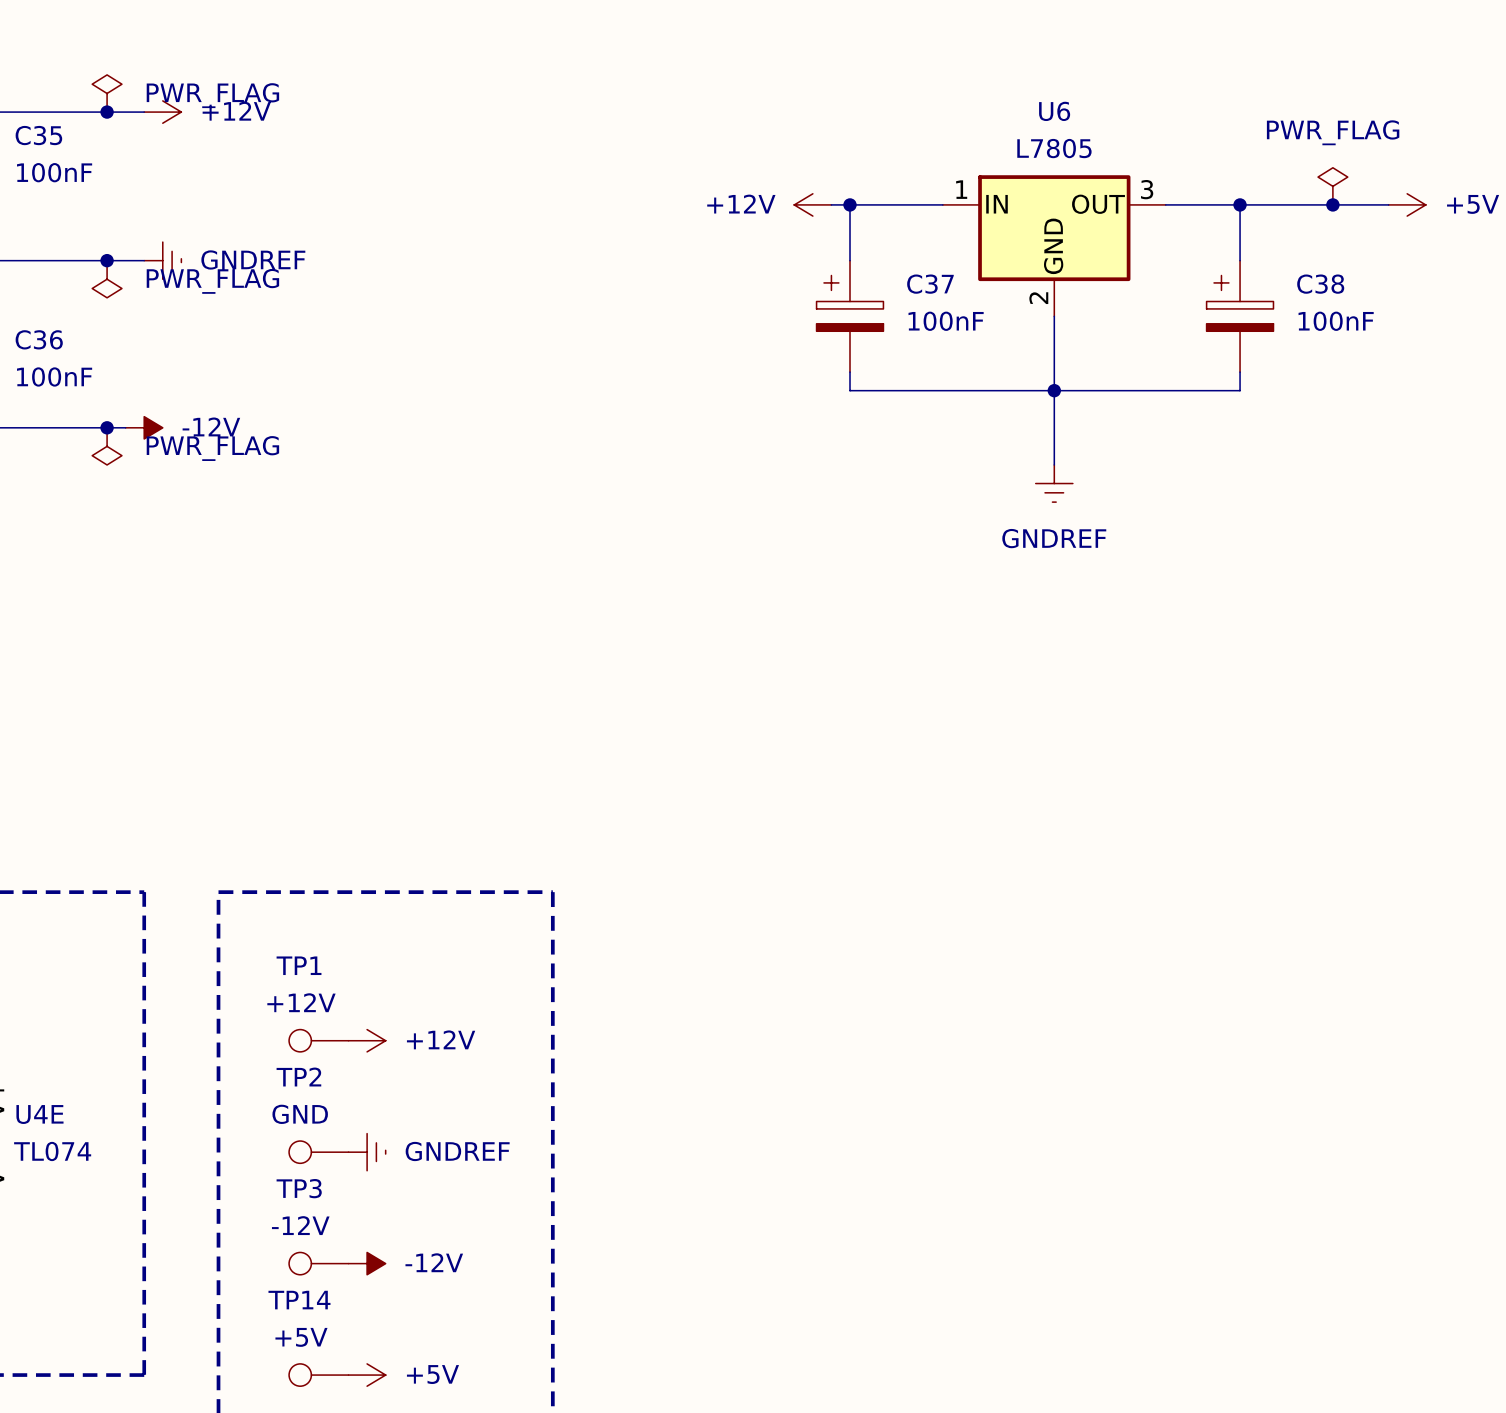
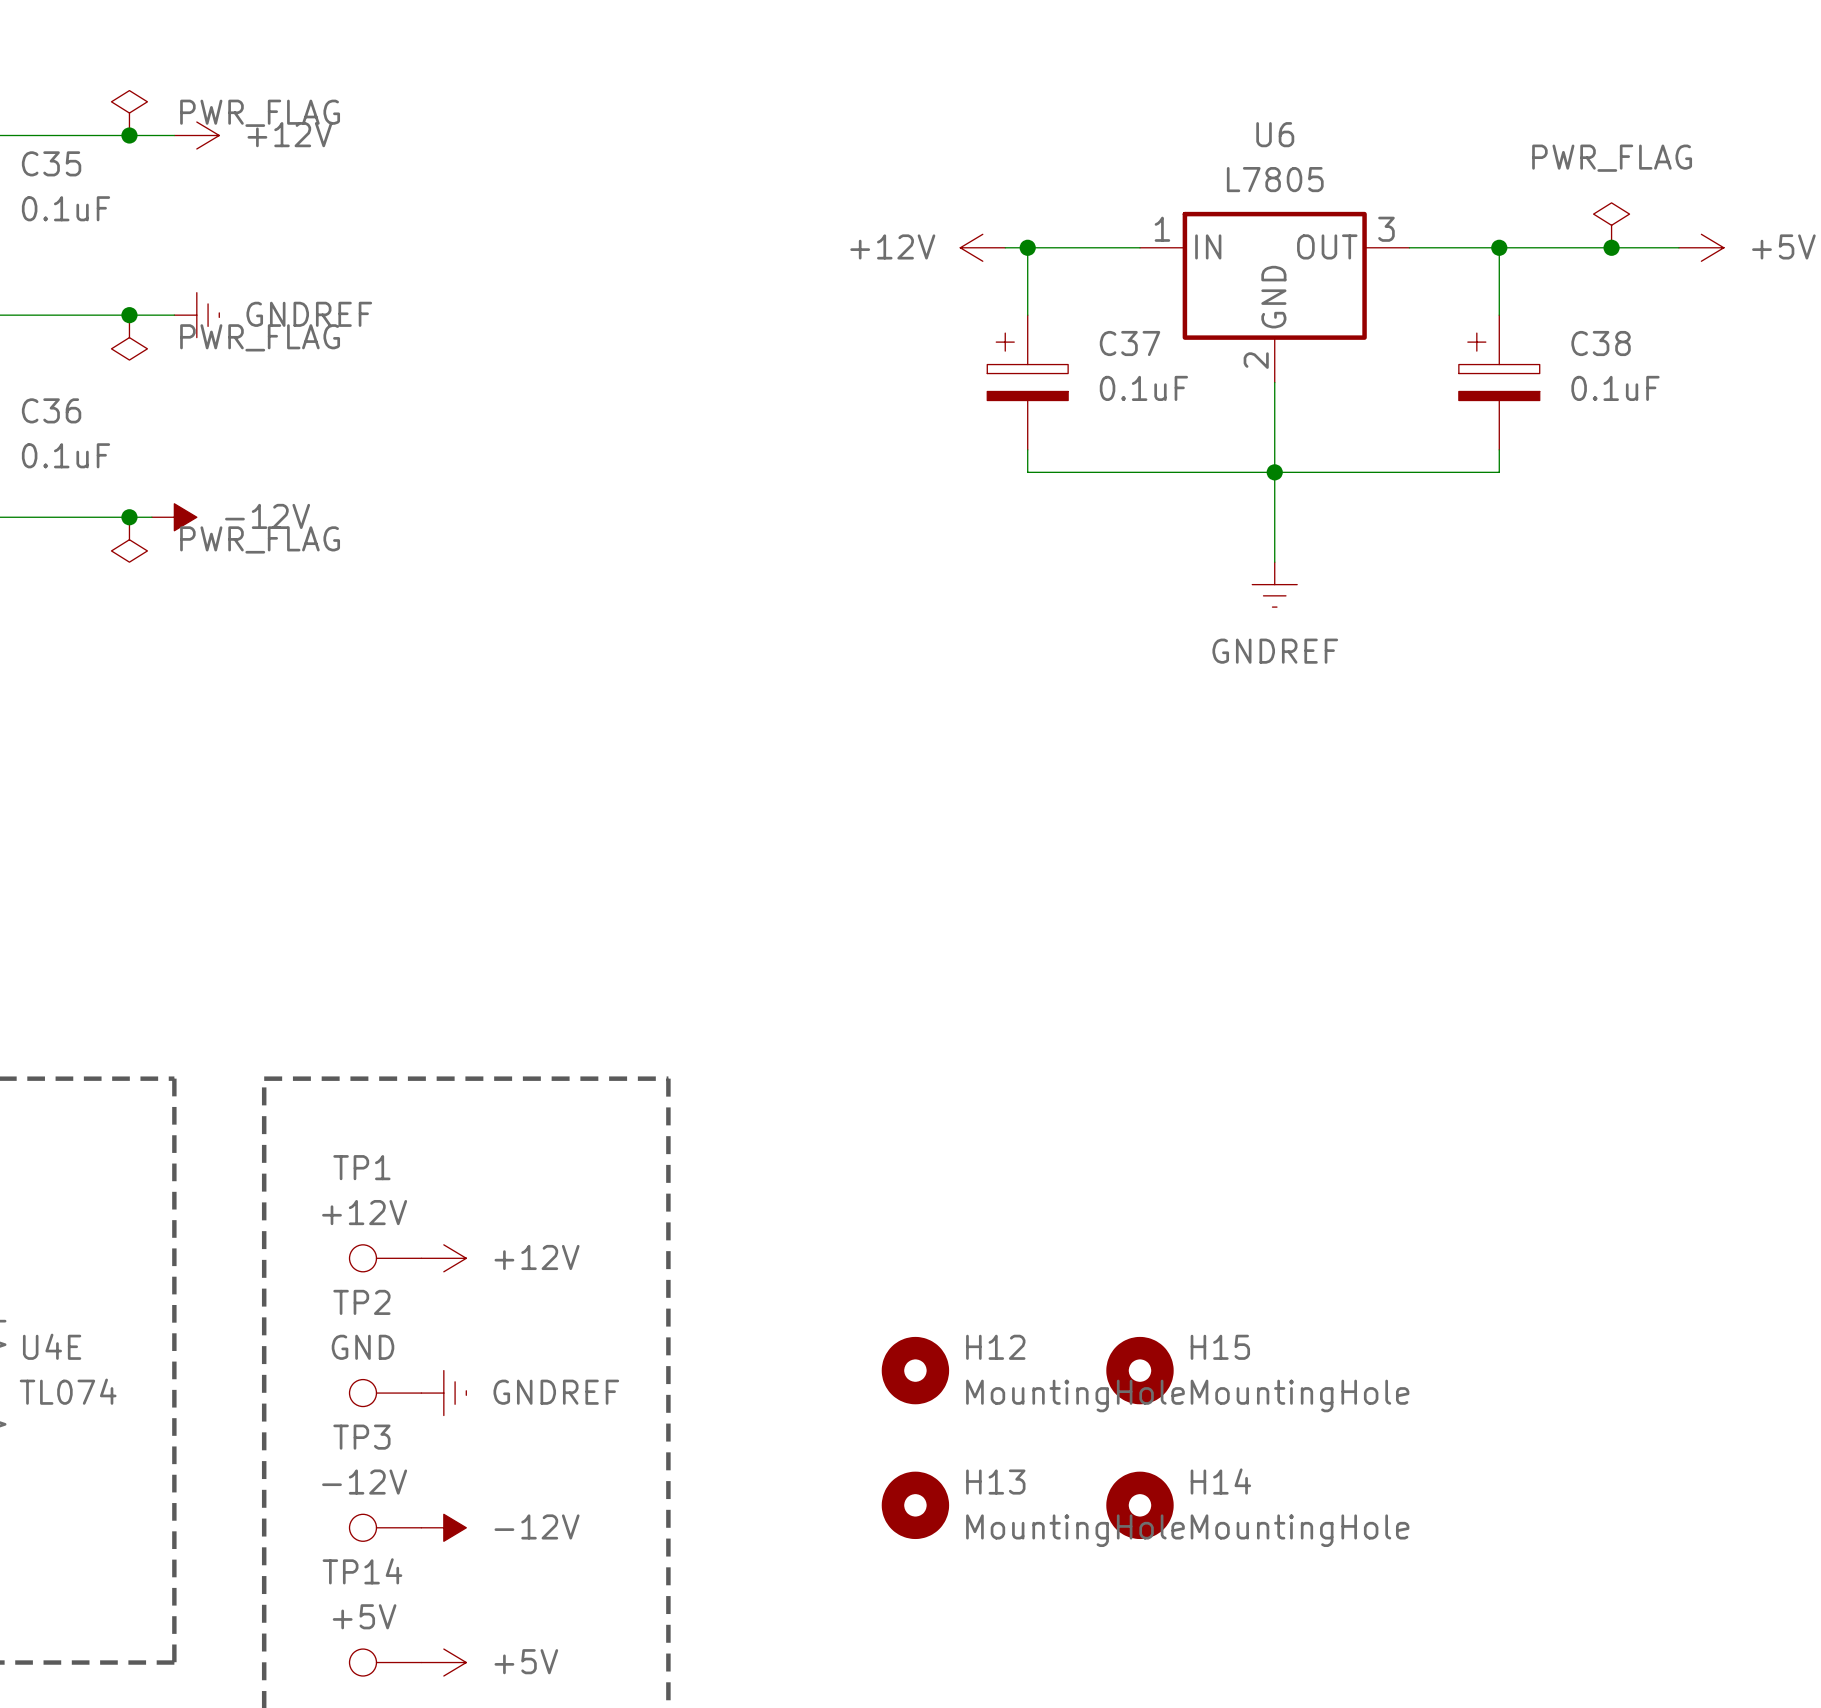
C35 value: 100nF (54, 172) -> 0.1uF (65, 208)
C37 value: 100nF (946, 321) -> 0.1uF (1143, 388)
C38 value: 100nF (1336, 321) -> 0.1uF (1615, 388)
C36 value: 100nF (54, 376) -> 0.1uF (65, 455)
H12: none -> MountingHole (915, 1370)
H15: none -> MountingHole (1139, 1370)
H13: none -> MountingHole (915, 1505)
H14: none -> MountingHole (1139, 1505)

